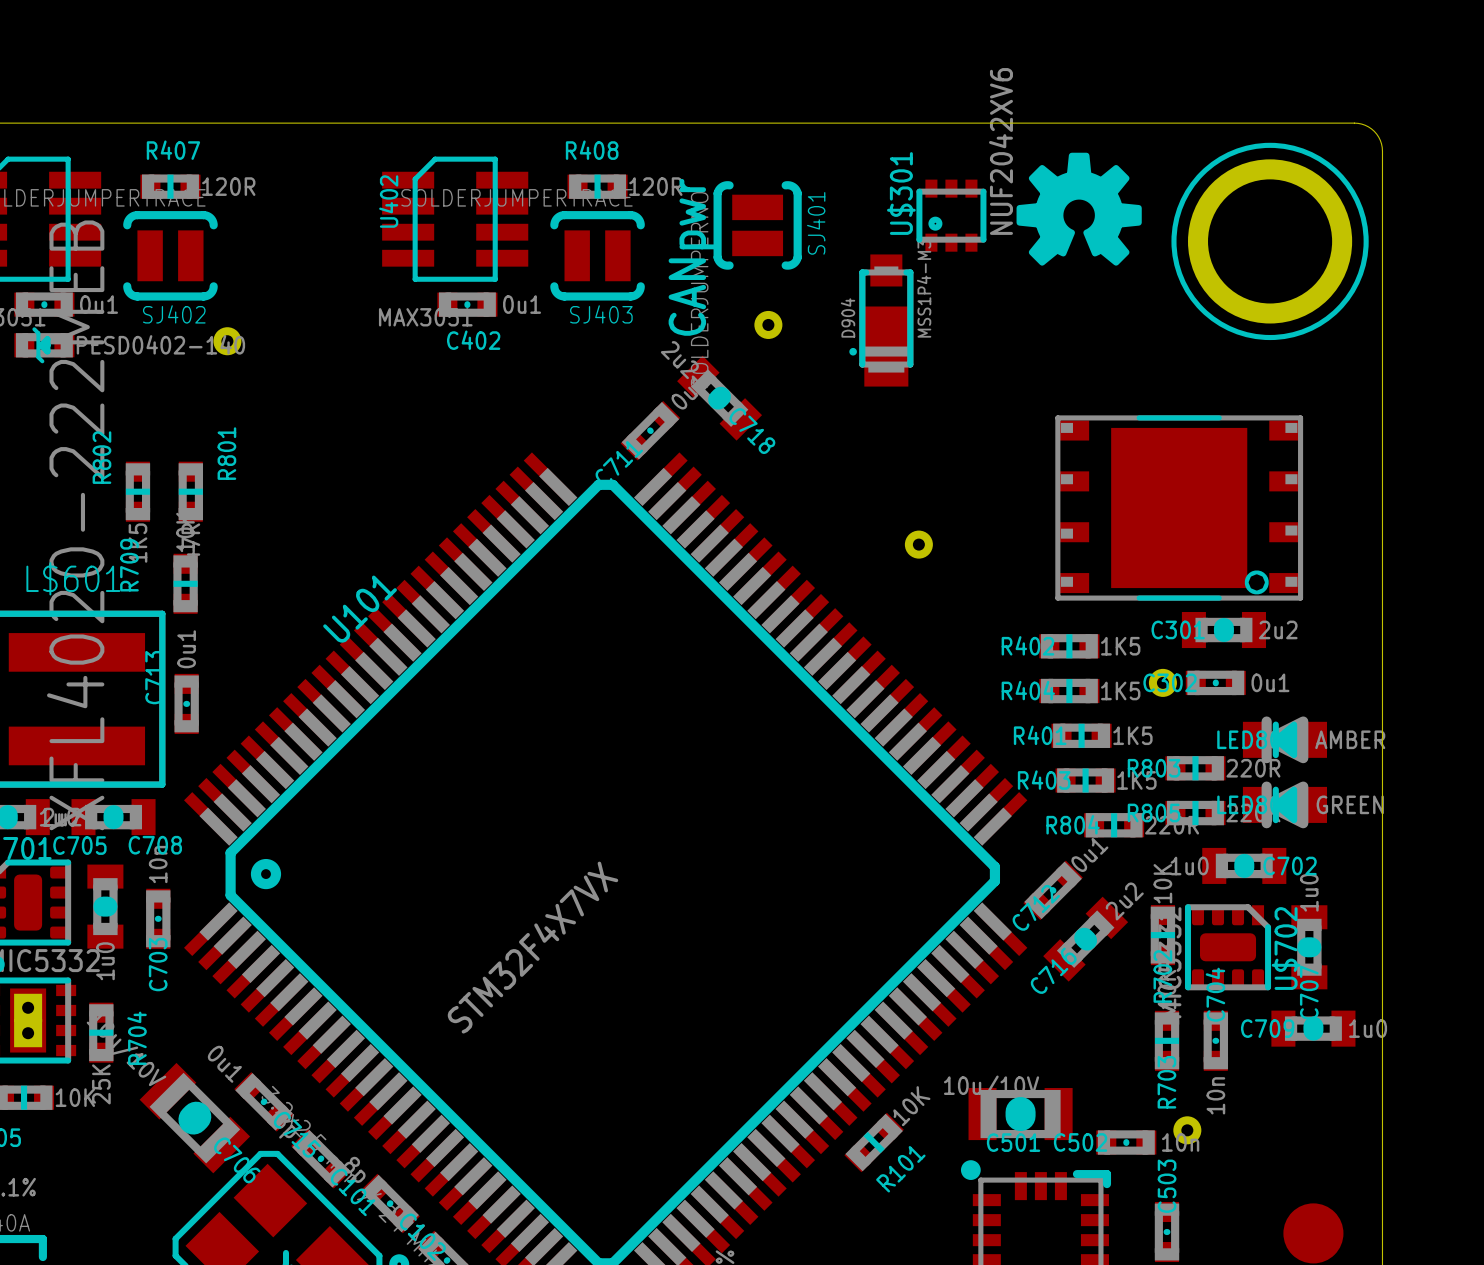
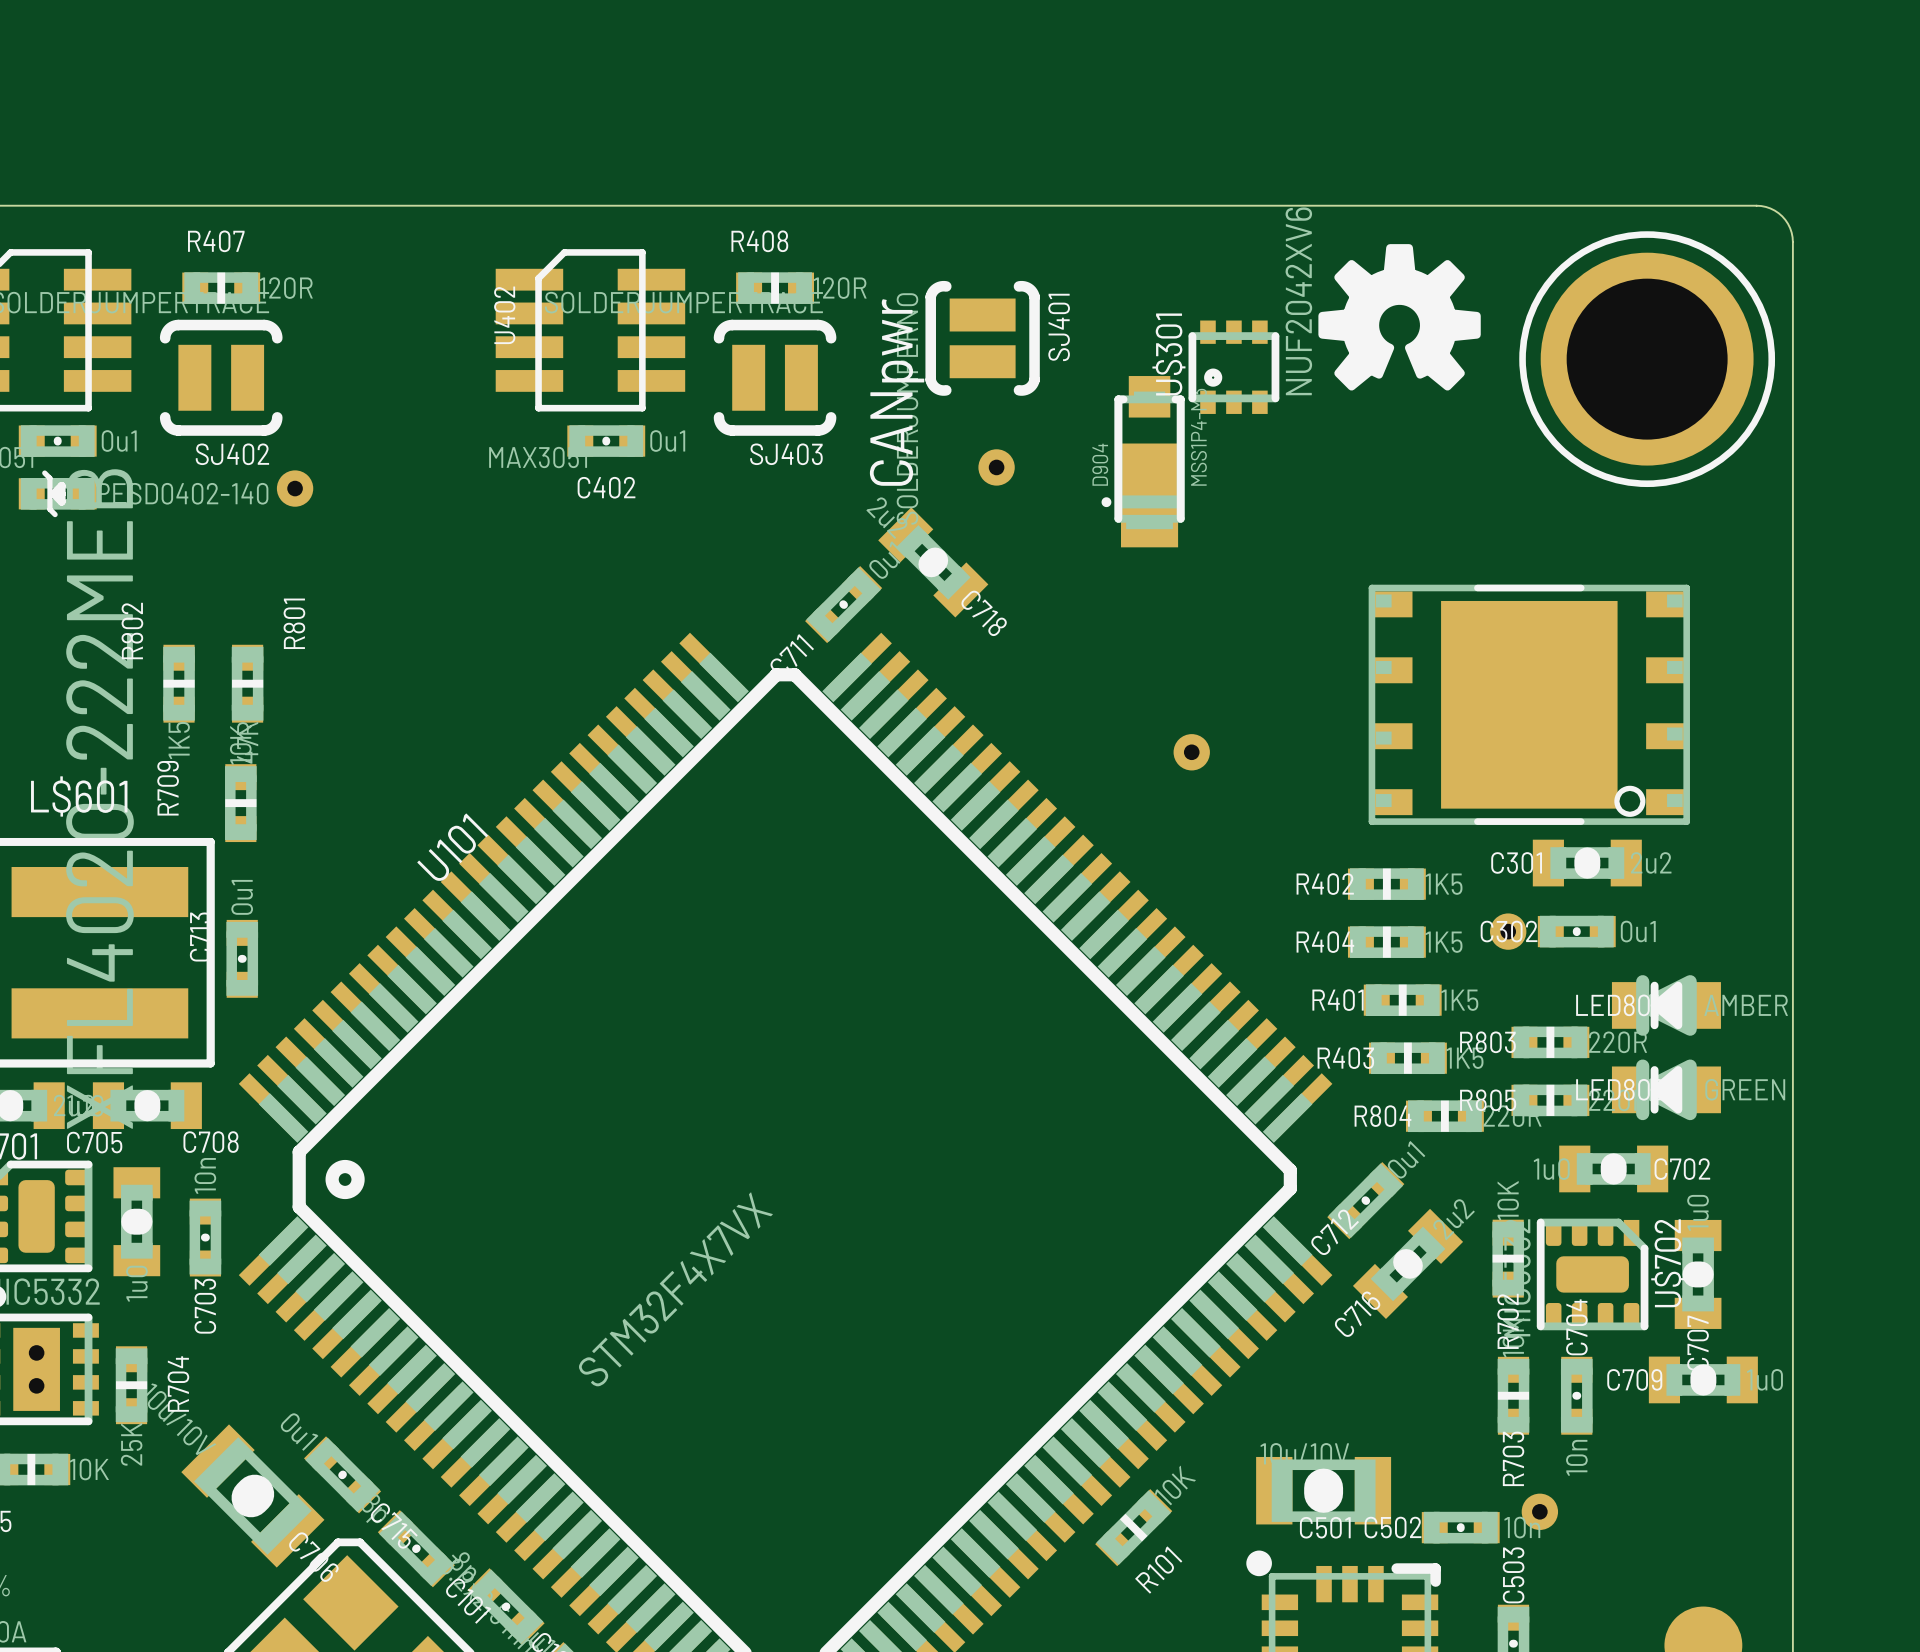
U$301 position: (951, 215) -> (1233, 367)

